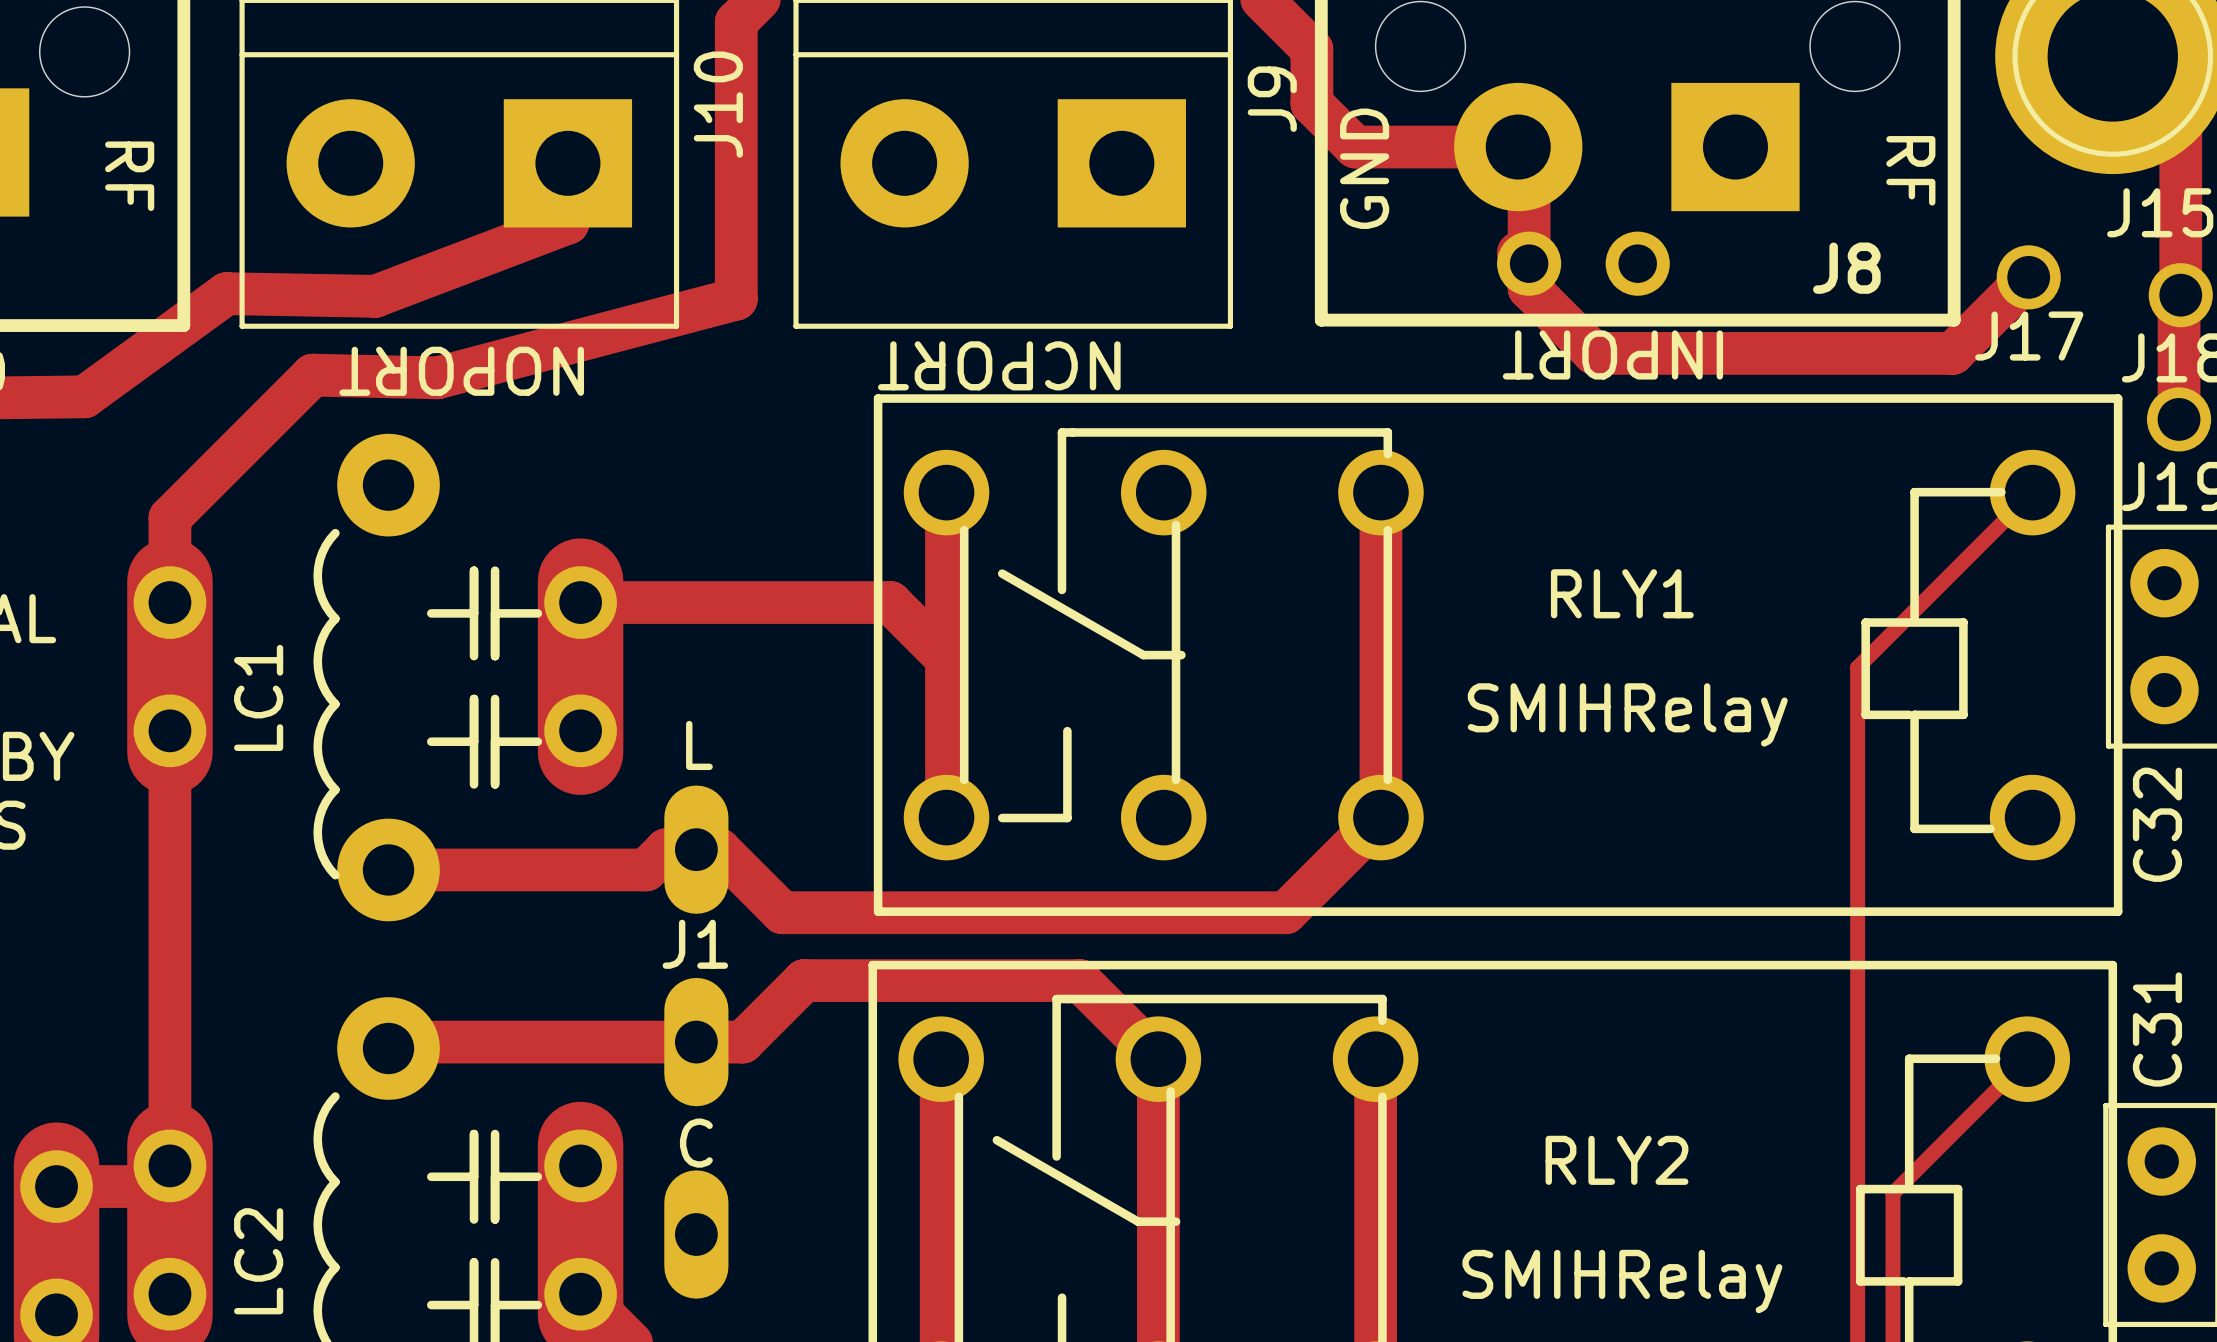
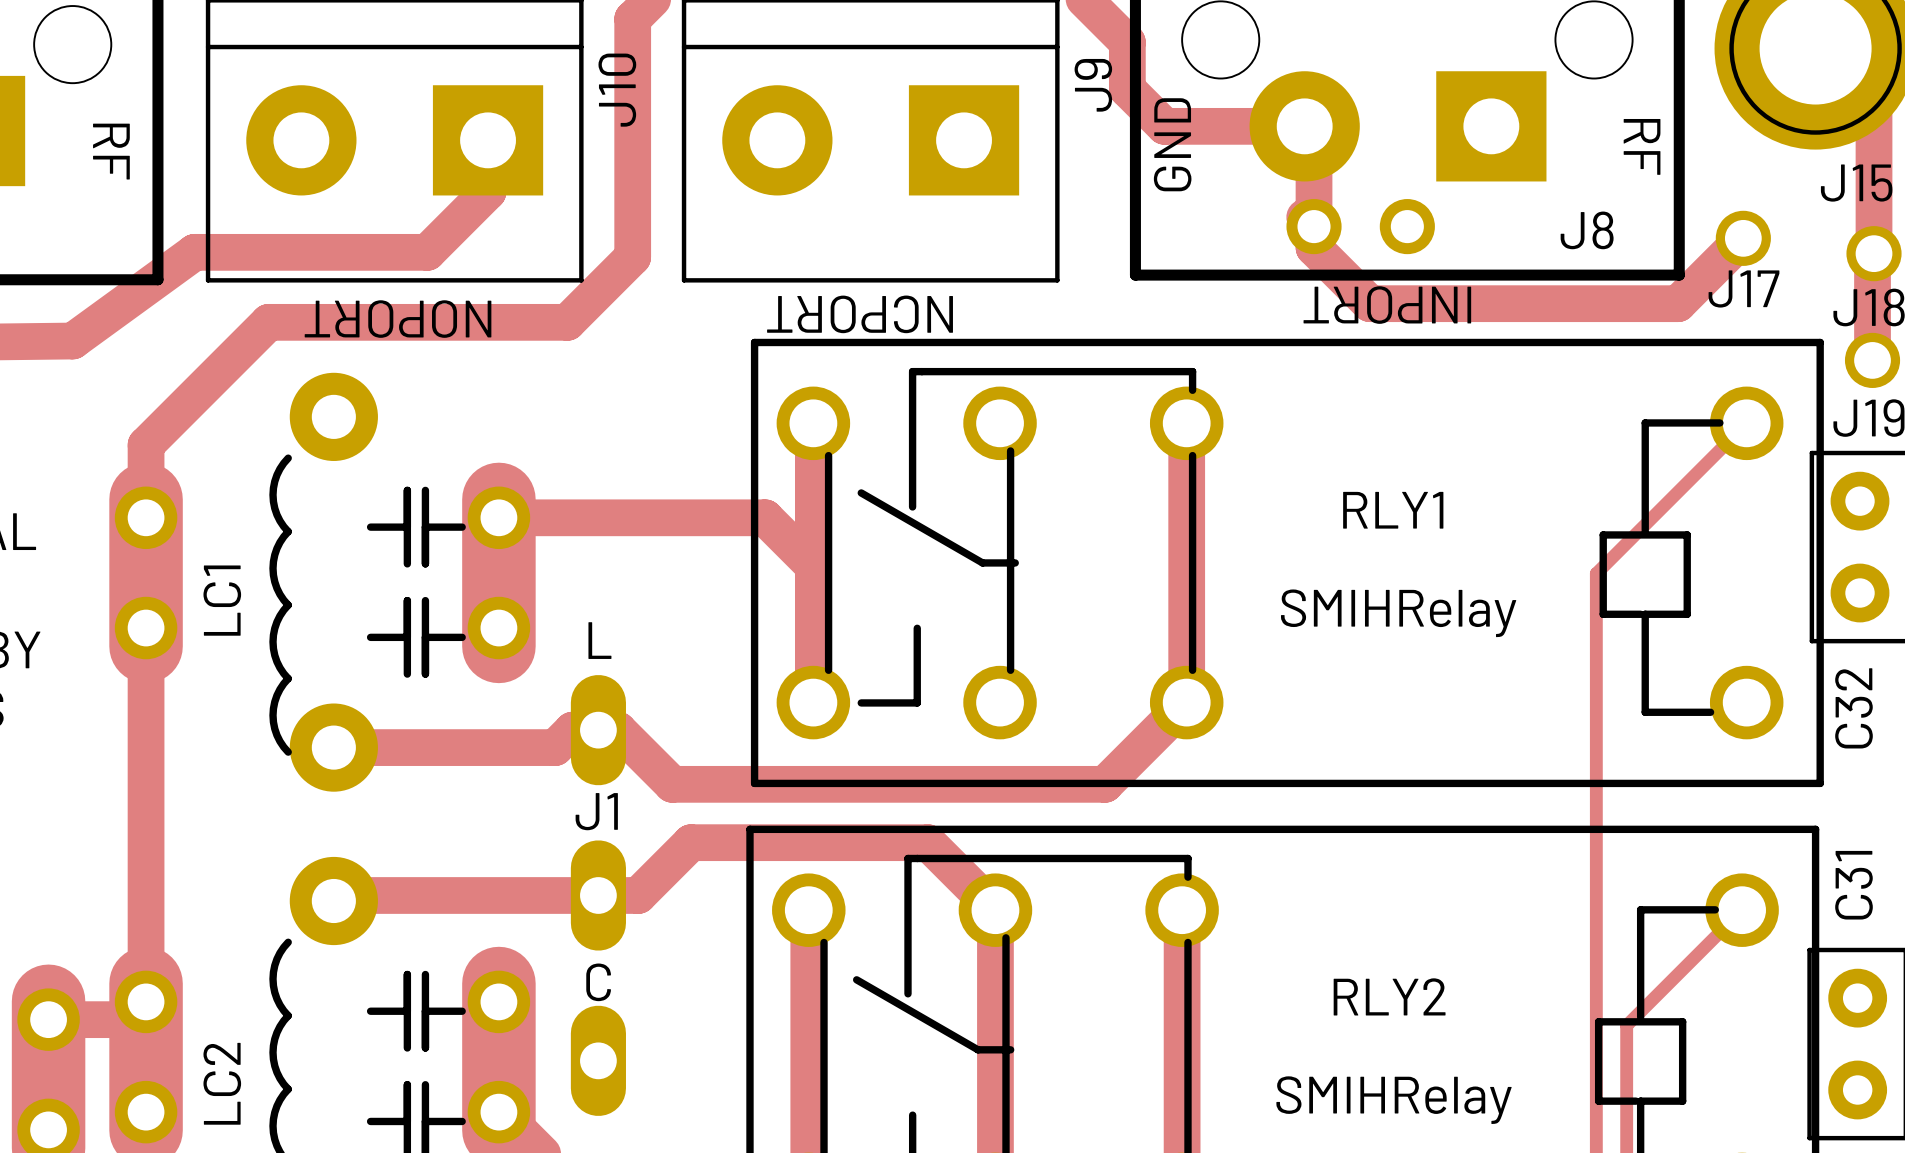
track: (567, 223) (375, 296) (226, 293) -> (488, 191) (427, 252) (194, 252)
track: (736, 299) (437, 377) (312, 375) -> (632, 257) (567, 322) (268, 322)

